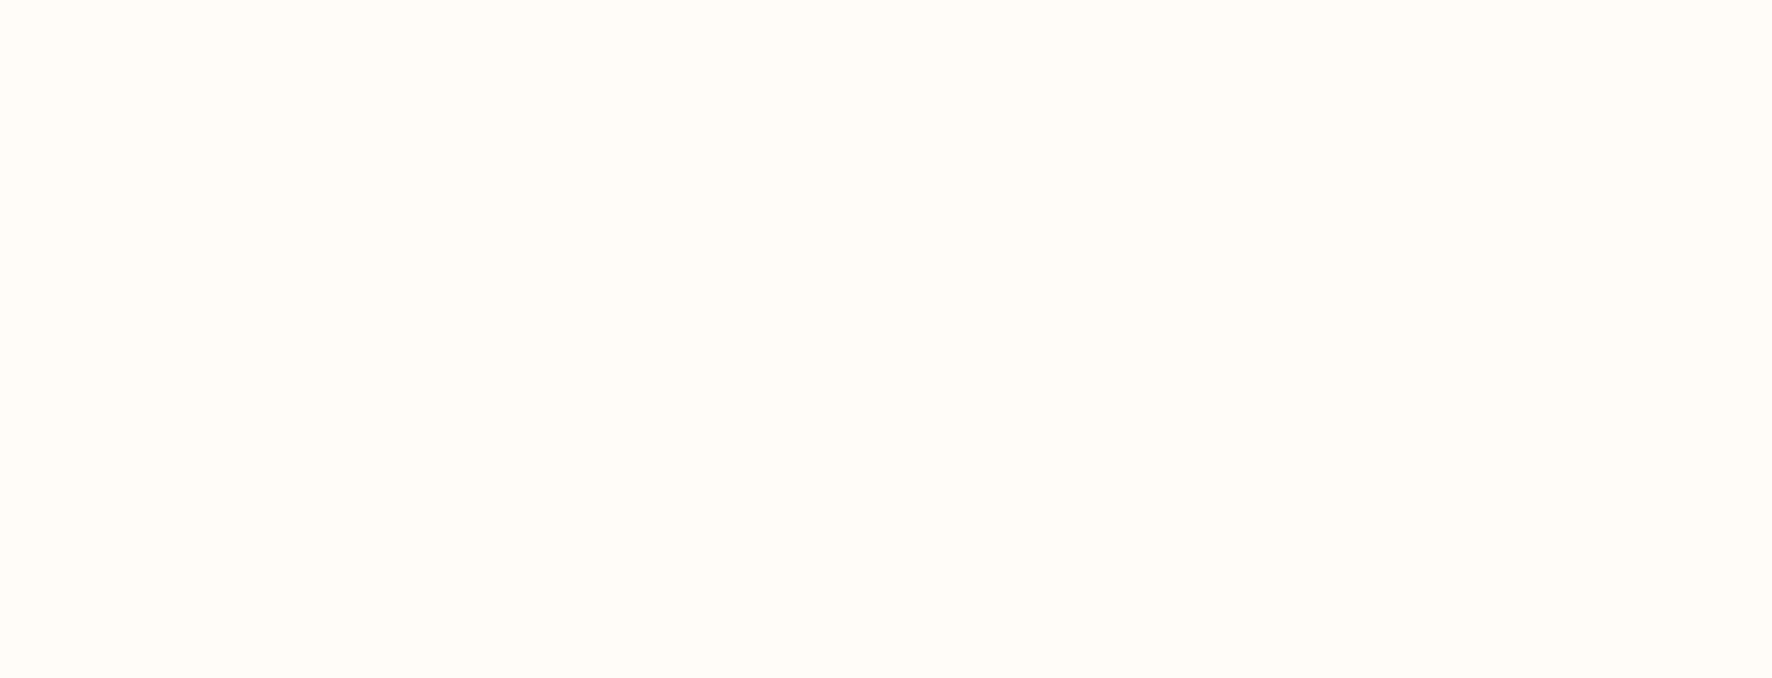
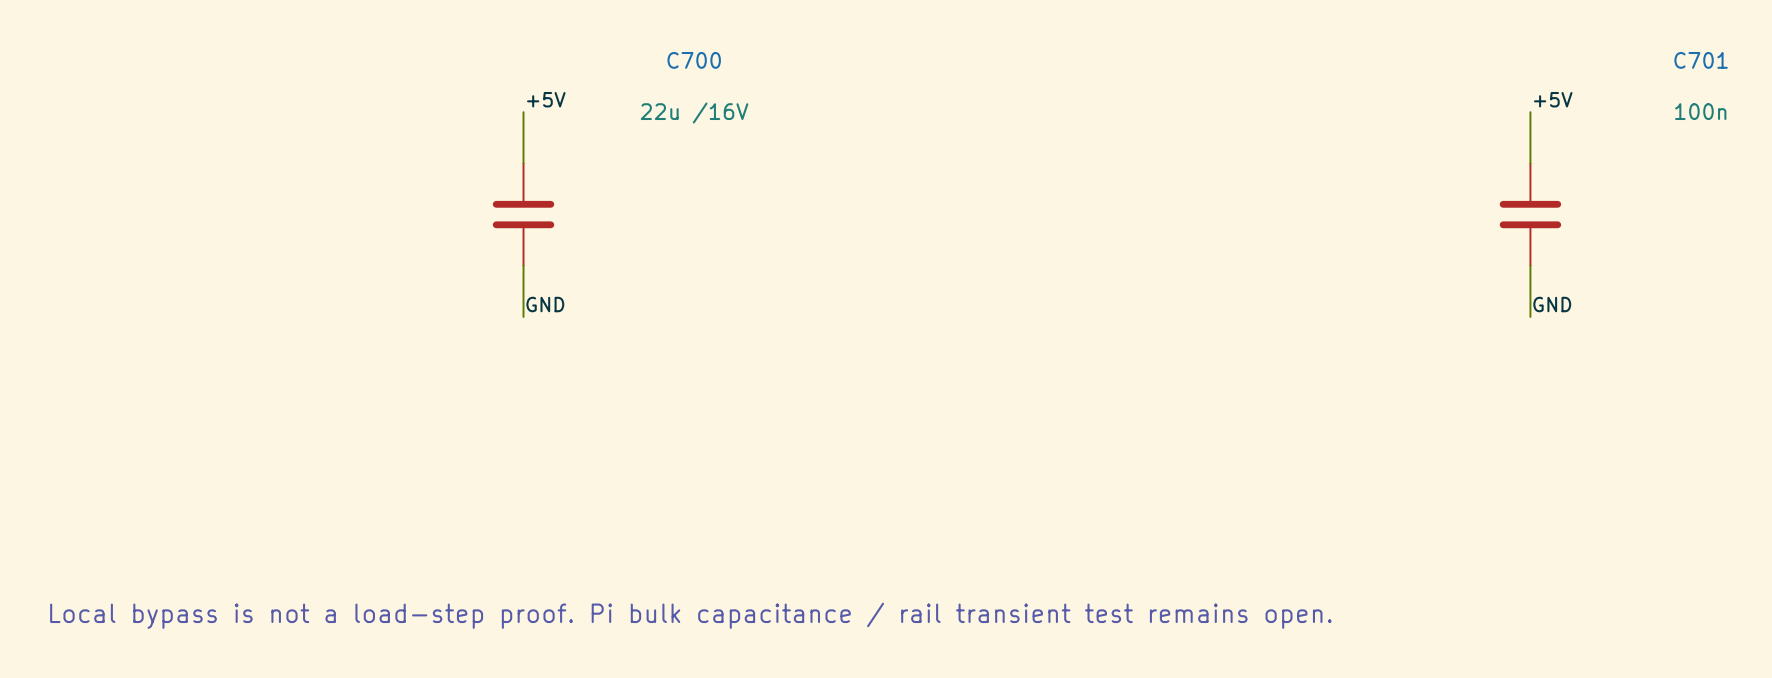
label: none -> +5V (546, 99)
label: none -> +5V (1553, 99)
wire: none -> (523, 112) (523, 163)
wire: none -> (1530, 112) (1530, 163)
C700: none -> 22u /16V (523, 214)
C701: none -> 100n (1530, 214)
wire: none -> (523, 265) (523, 316)
wire: none -> (1530, 265) (1530, 316)
label: none -> GND (545, 304)
label: none -> GND (1552, 304)
text: none -> Local bypass is not a load-step proof. Pi bulk capacitance / rail transient test remains open. (690, 615)

